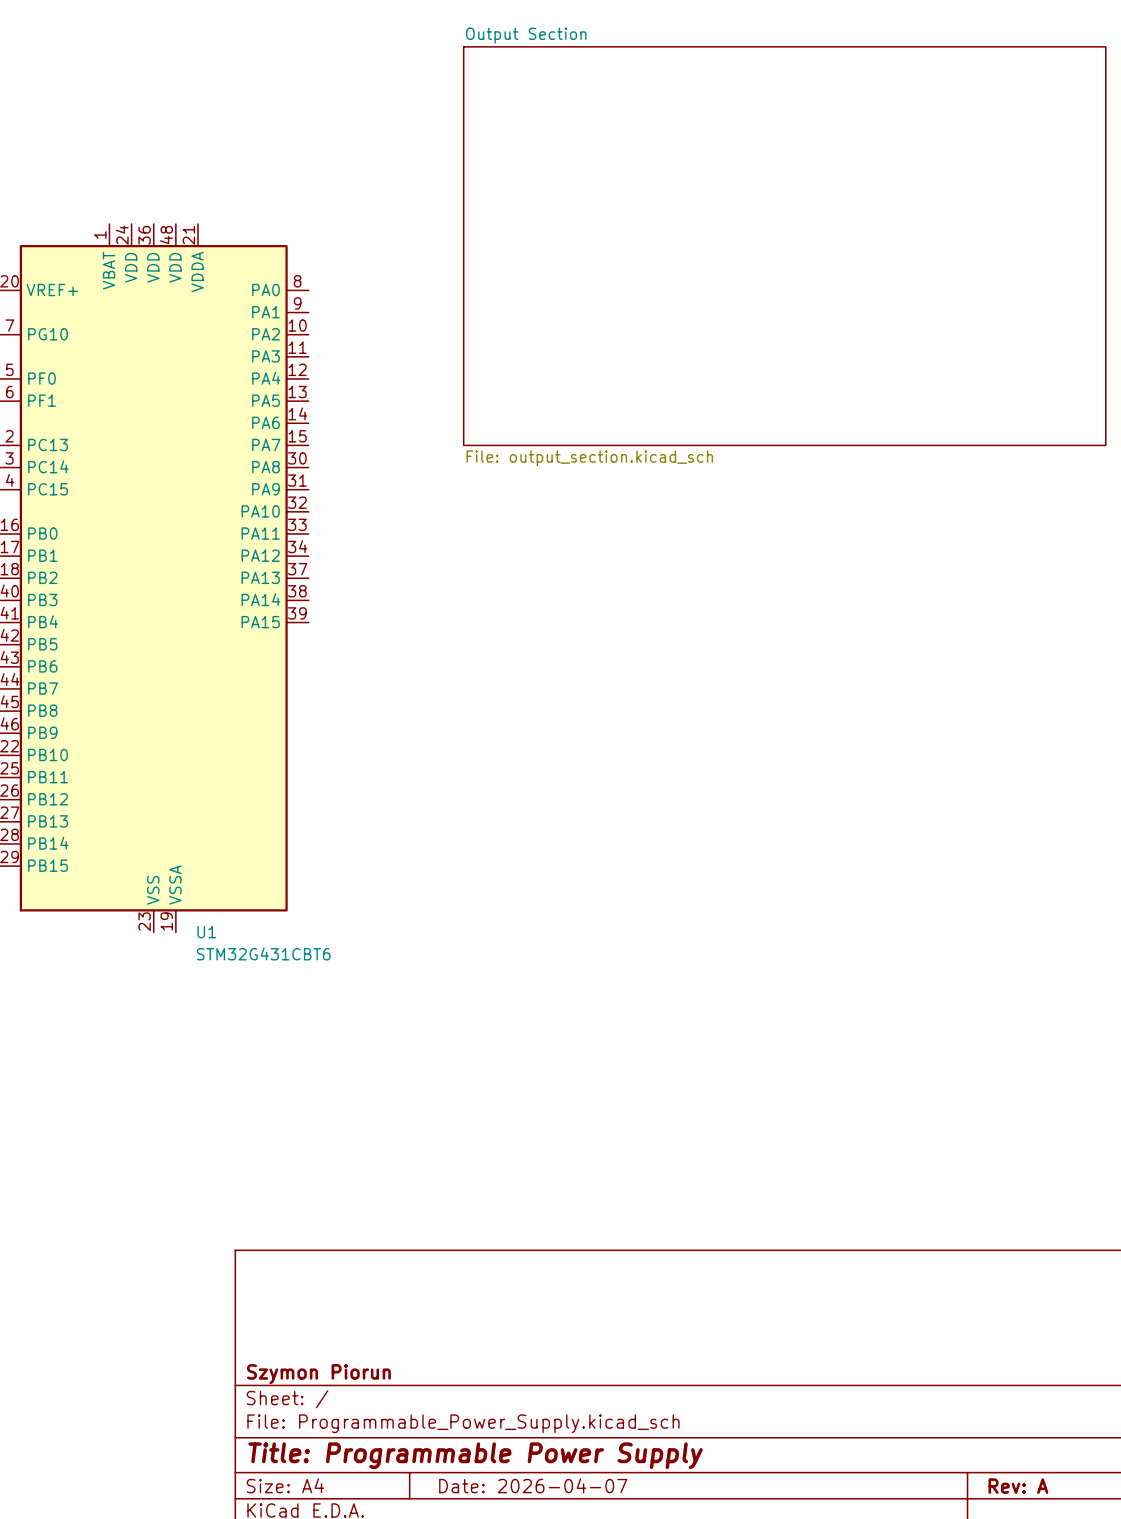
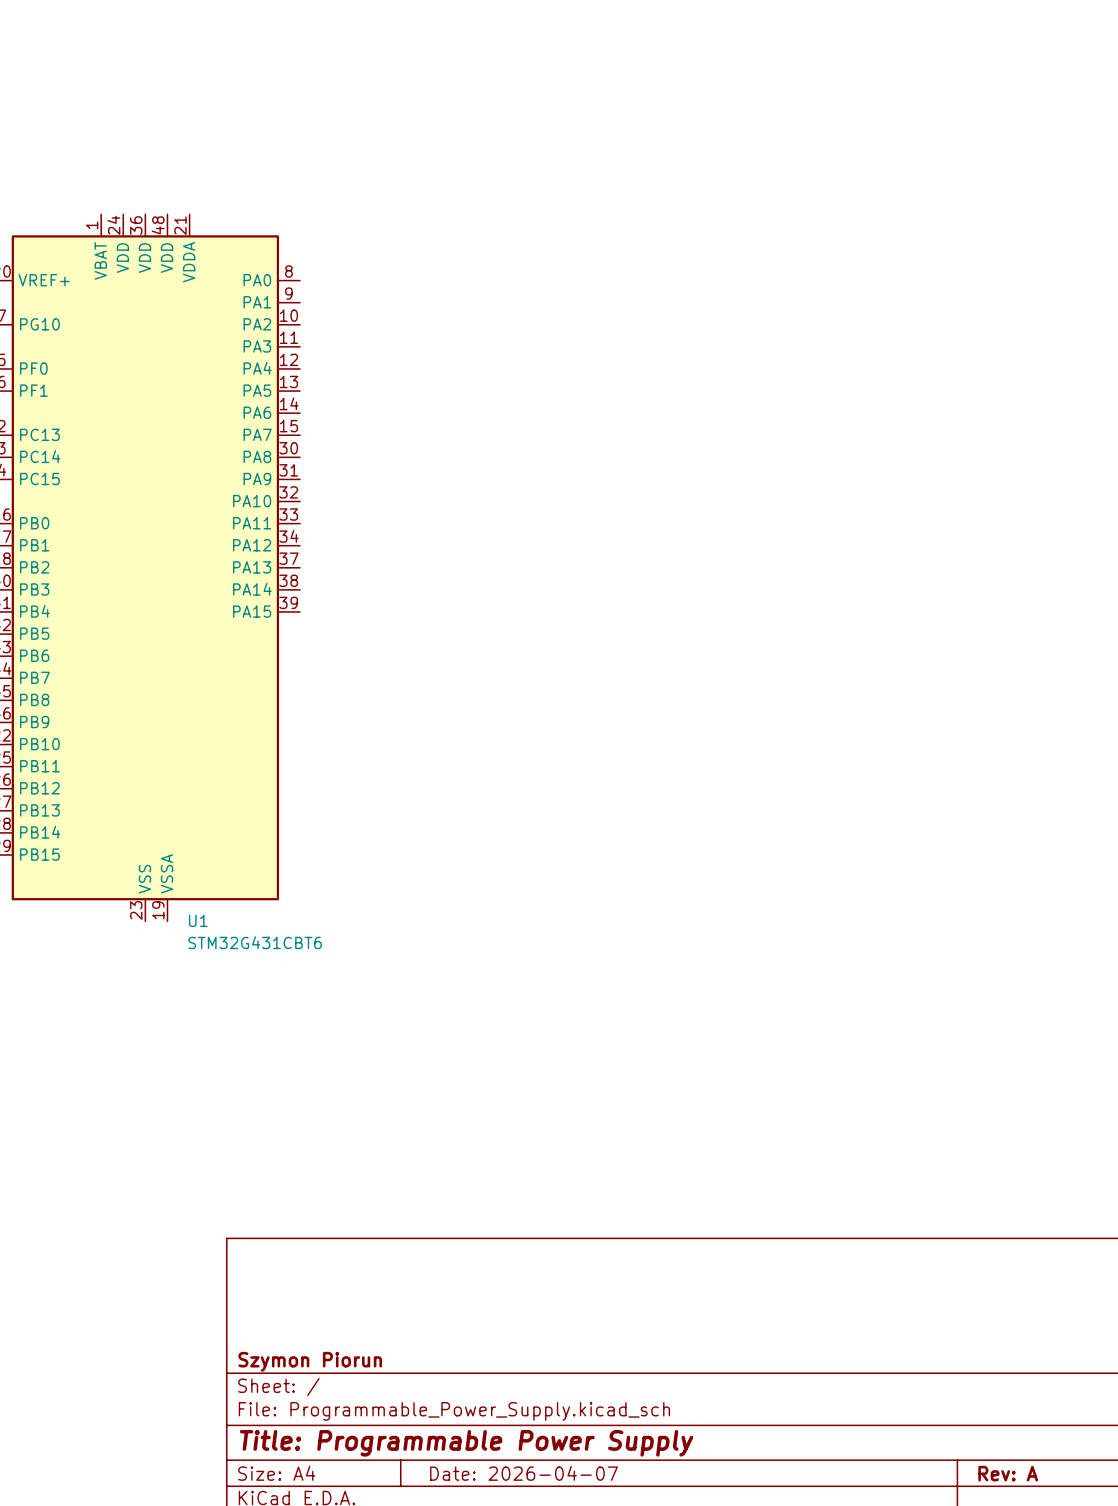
sheet Output Section: File: output_section.kicad_sch (784, 246) -> none

